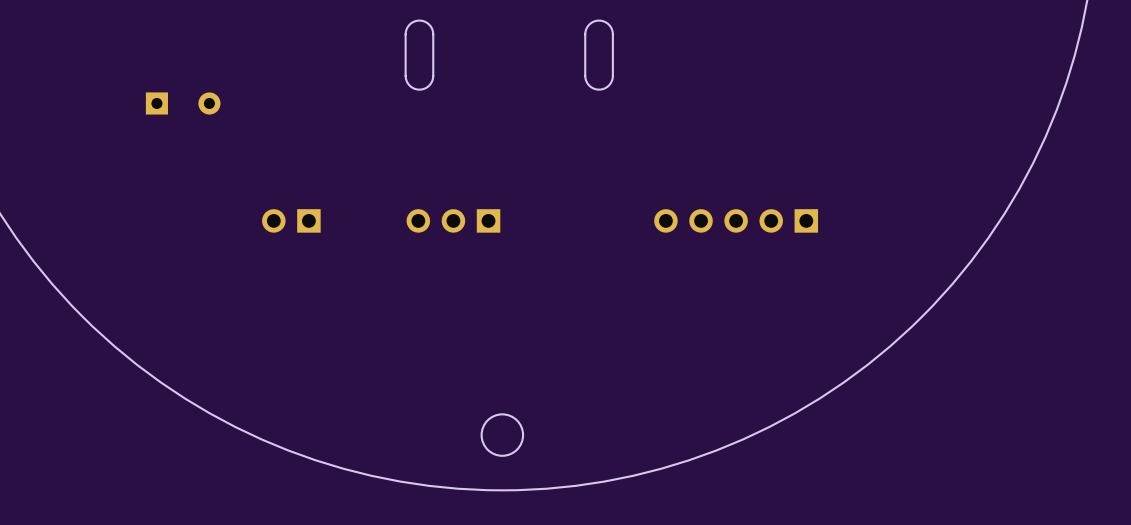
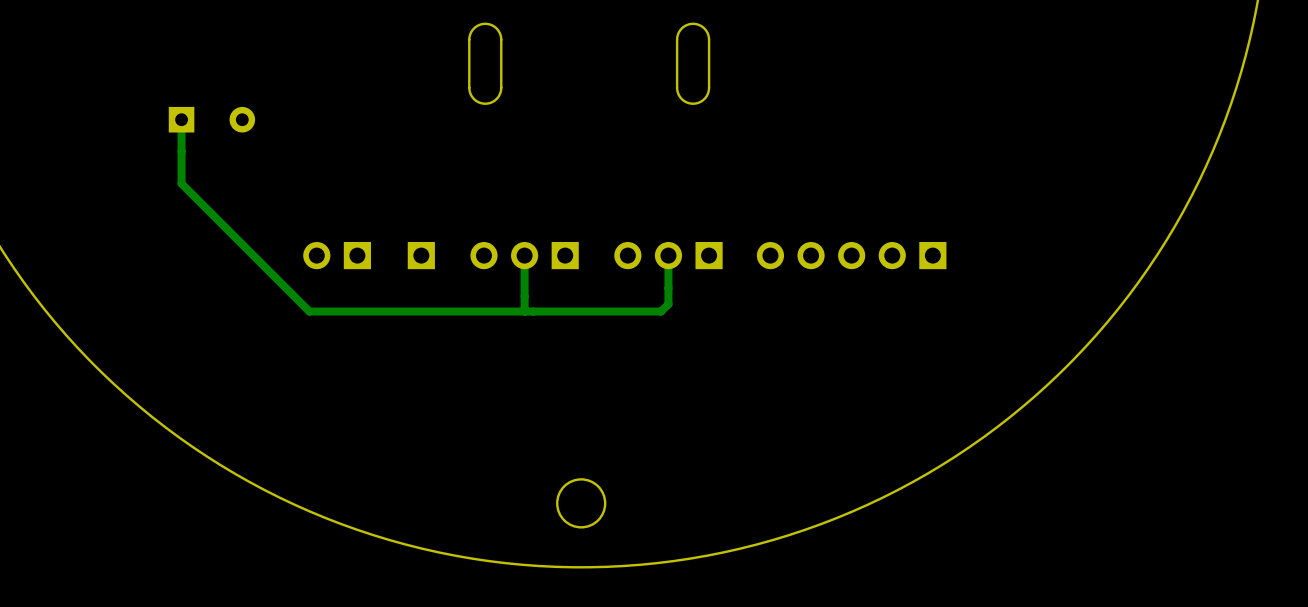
track: none -> (181, 119) (181, 183) (309, 311) (661, 311) (668, 304) (668, 255)
part: none -> (421, 255)
track: none -> (524, 255) (525, 311)
part: none -> (668, 255)

